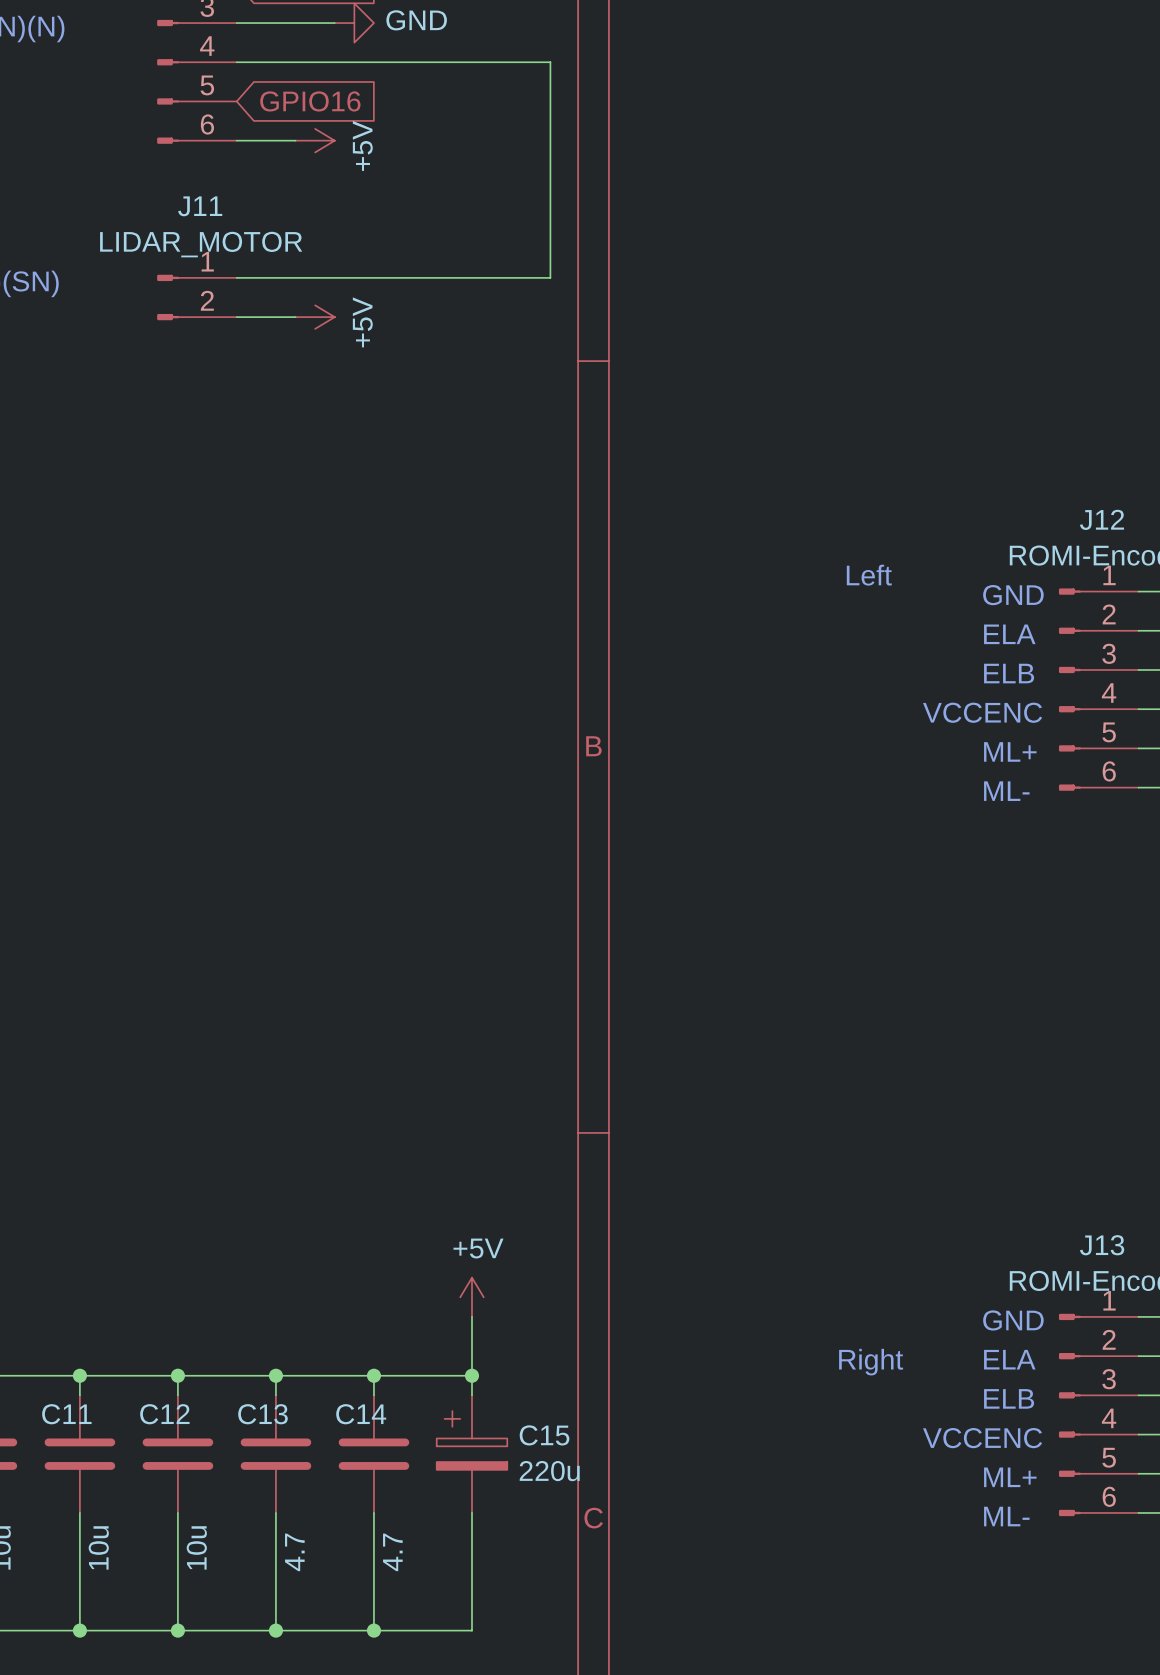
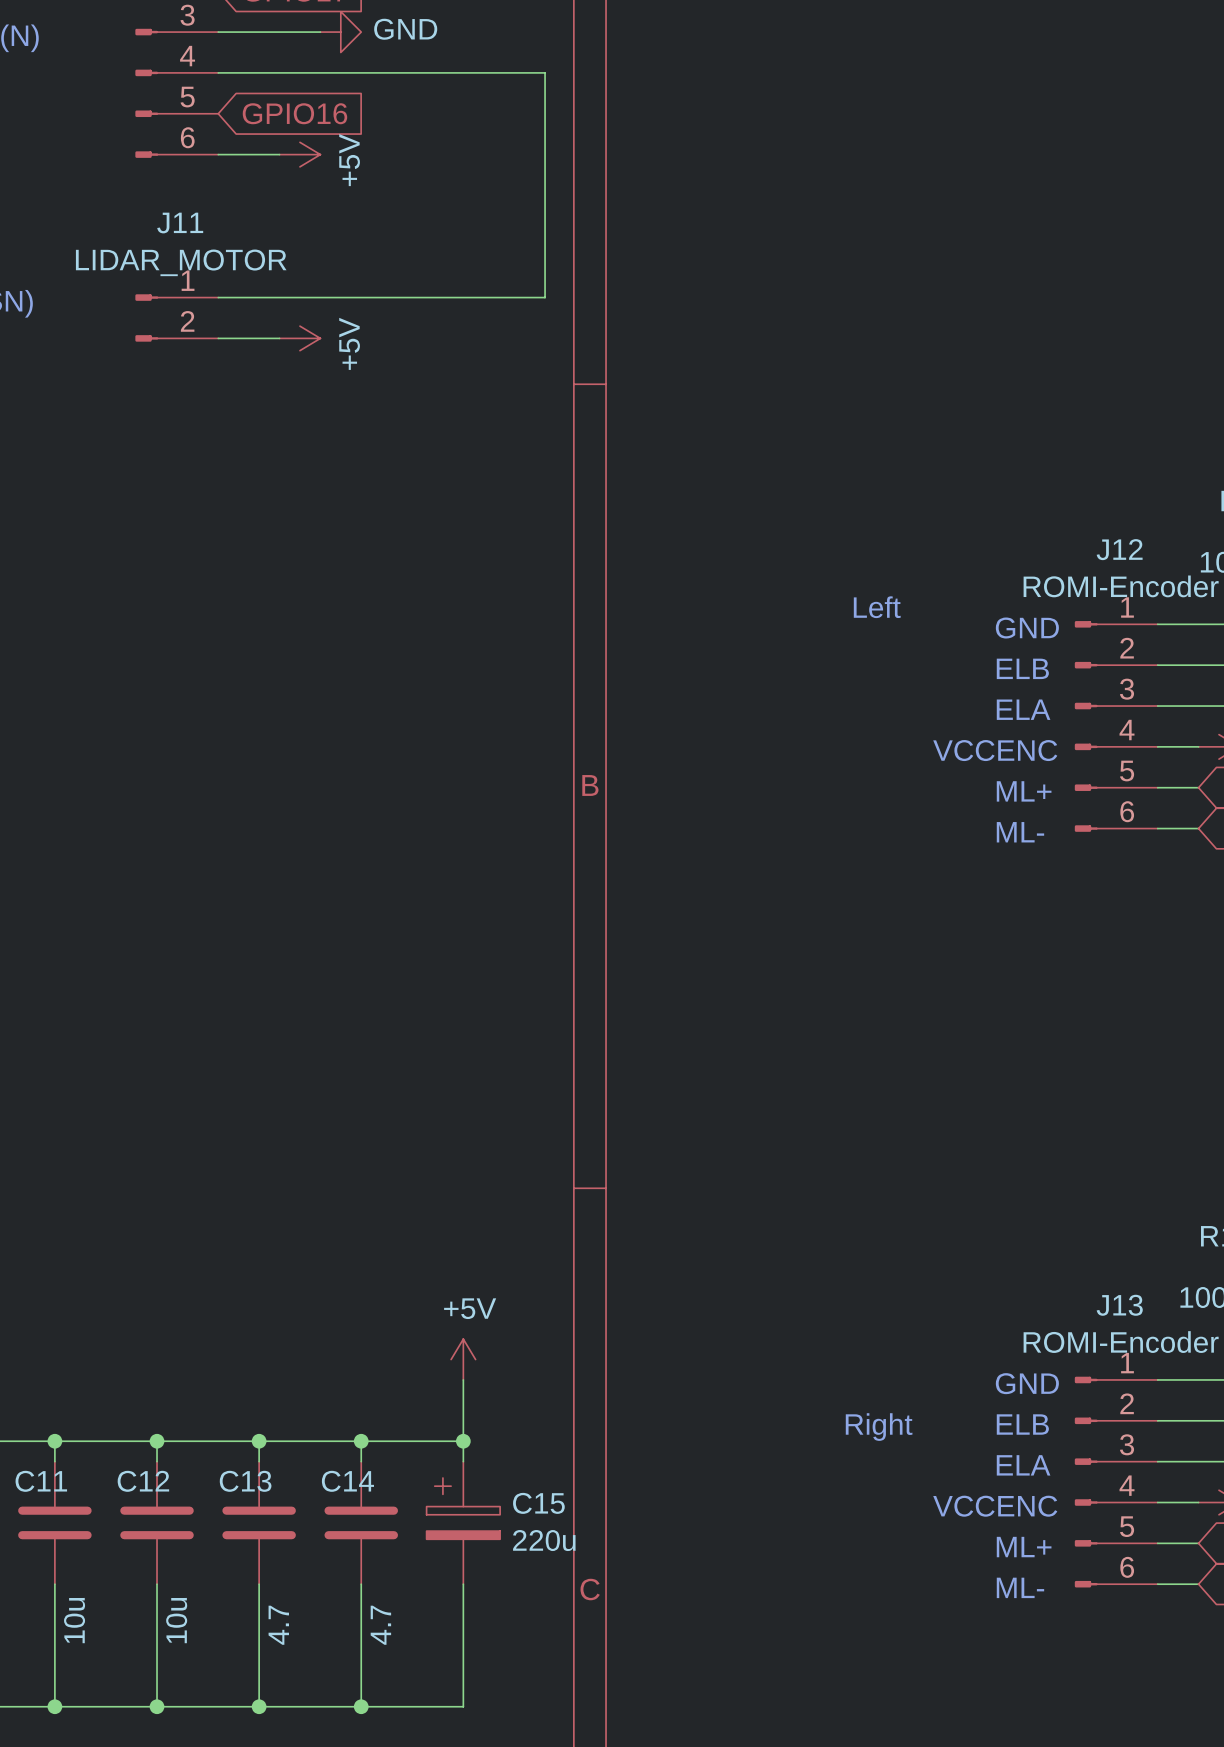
text: ELA (1009, 634) -> ELB (1022, 668)
text: ELB (1009, 673) -> ELA (1023, 709)
text: ELA (1009, 1359) -> ELB (1022, 1424)
text: ELB (1009, 1398) -> ELA (1023, 1465)

